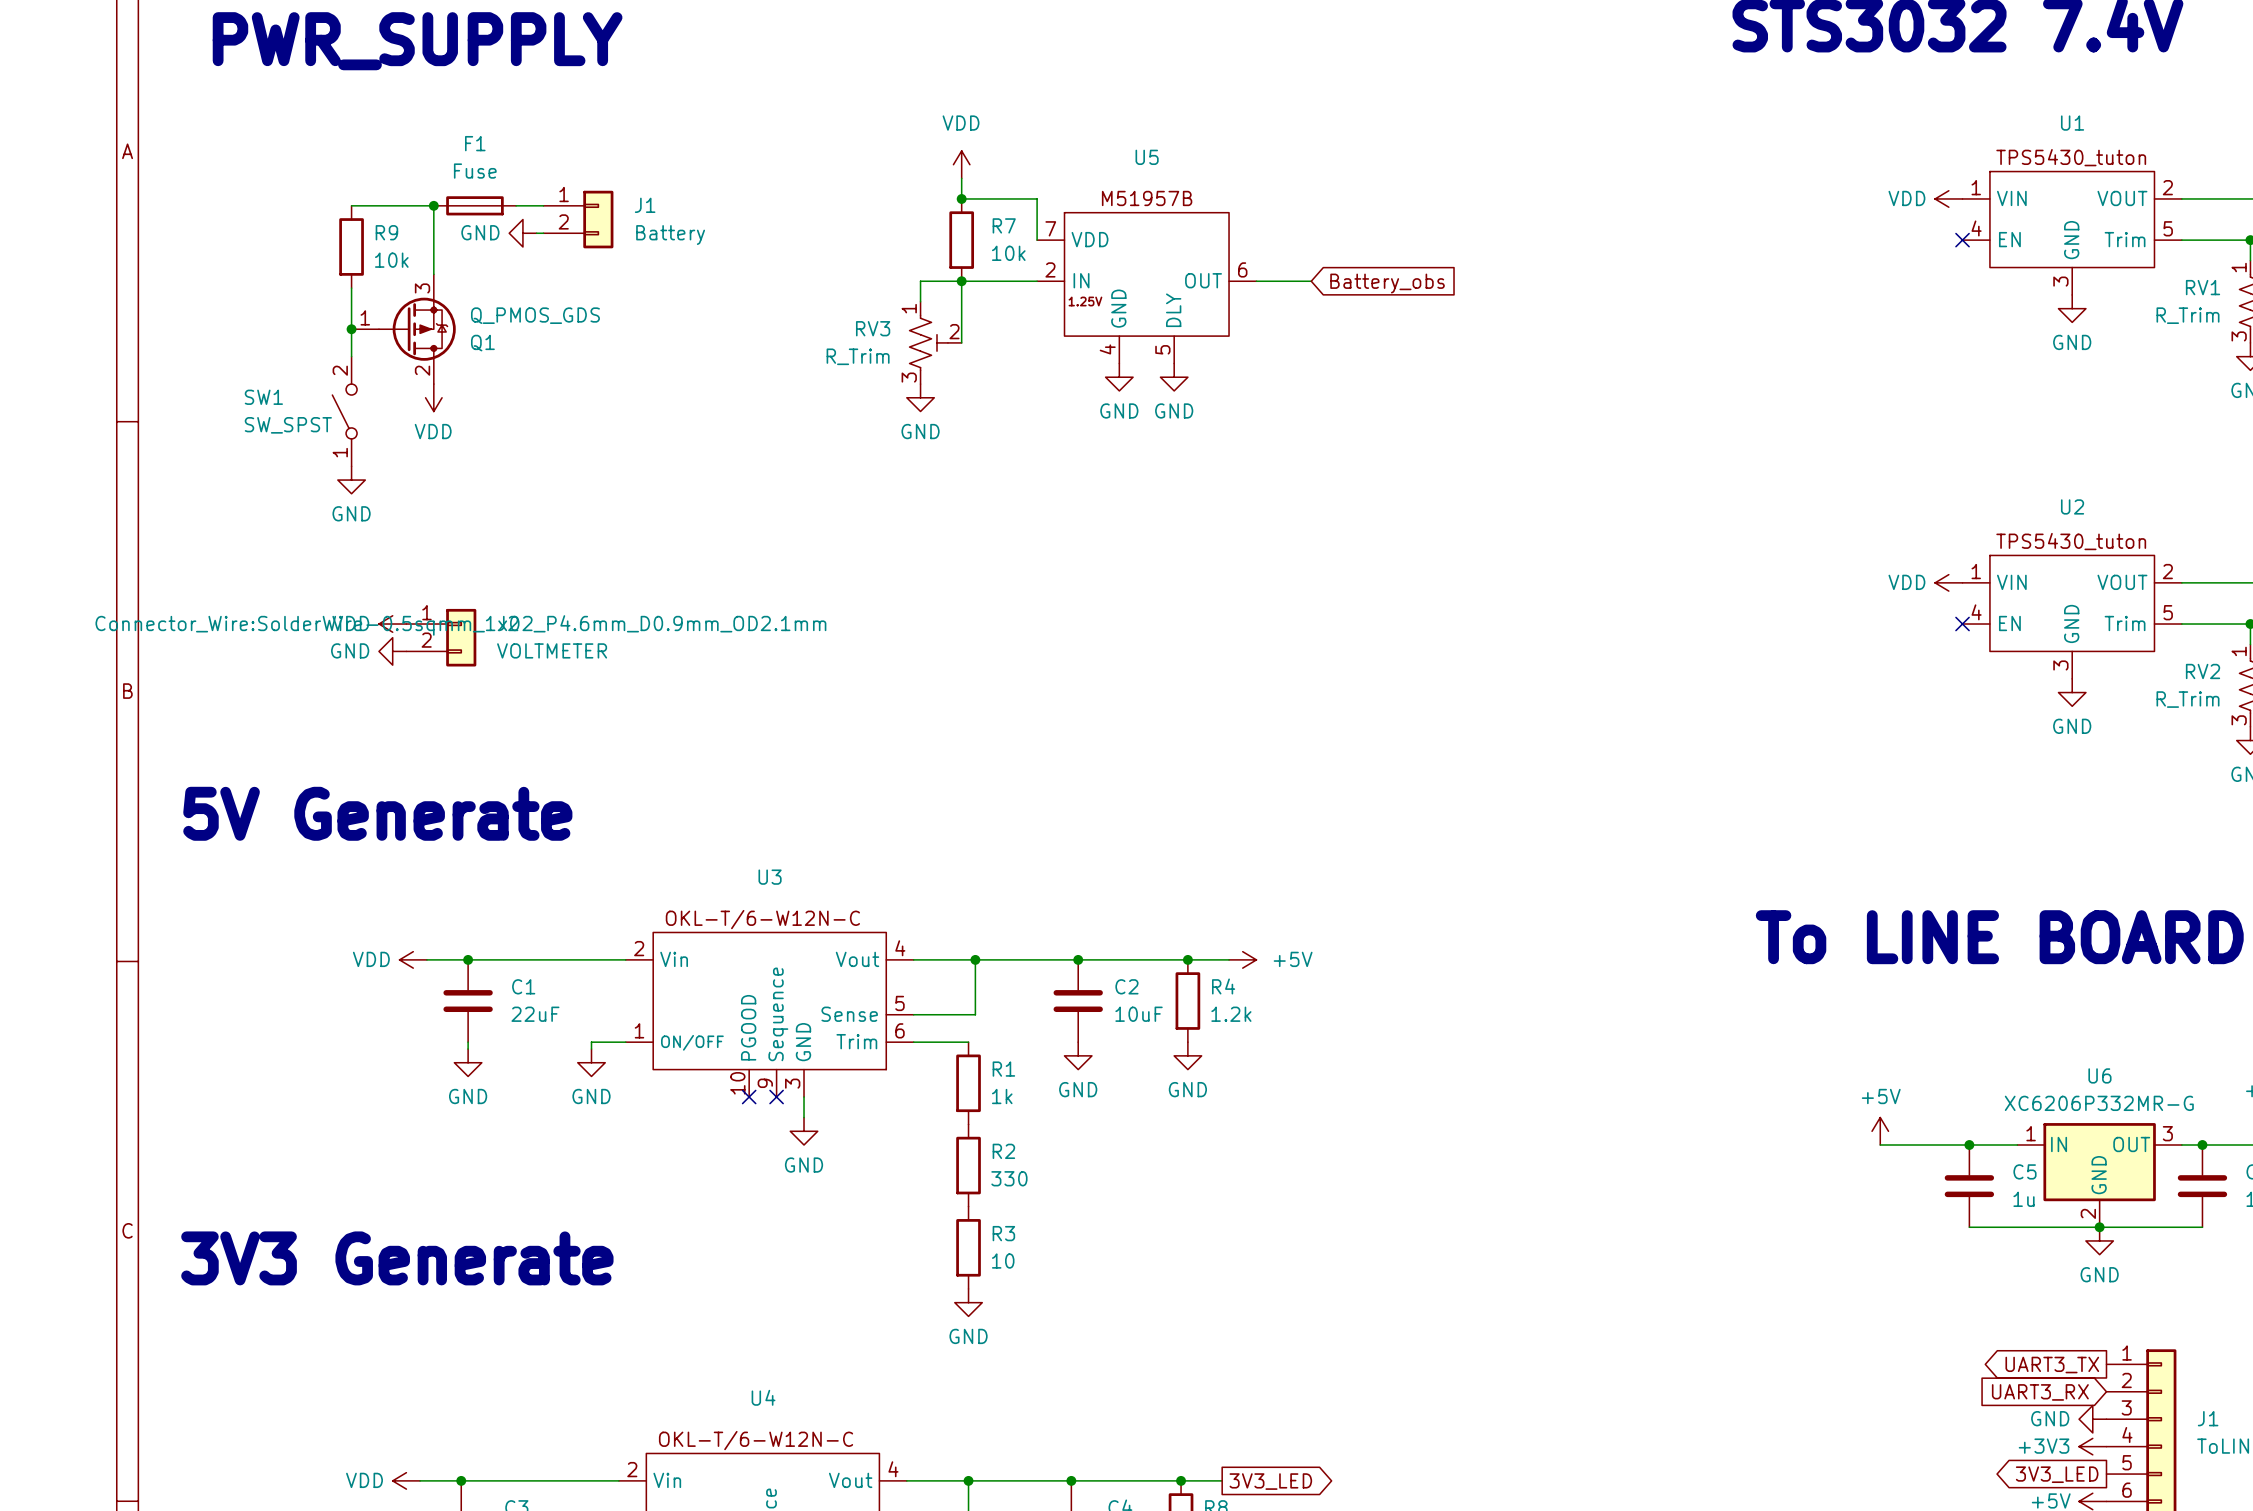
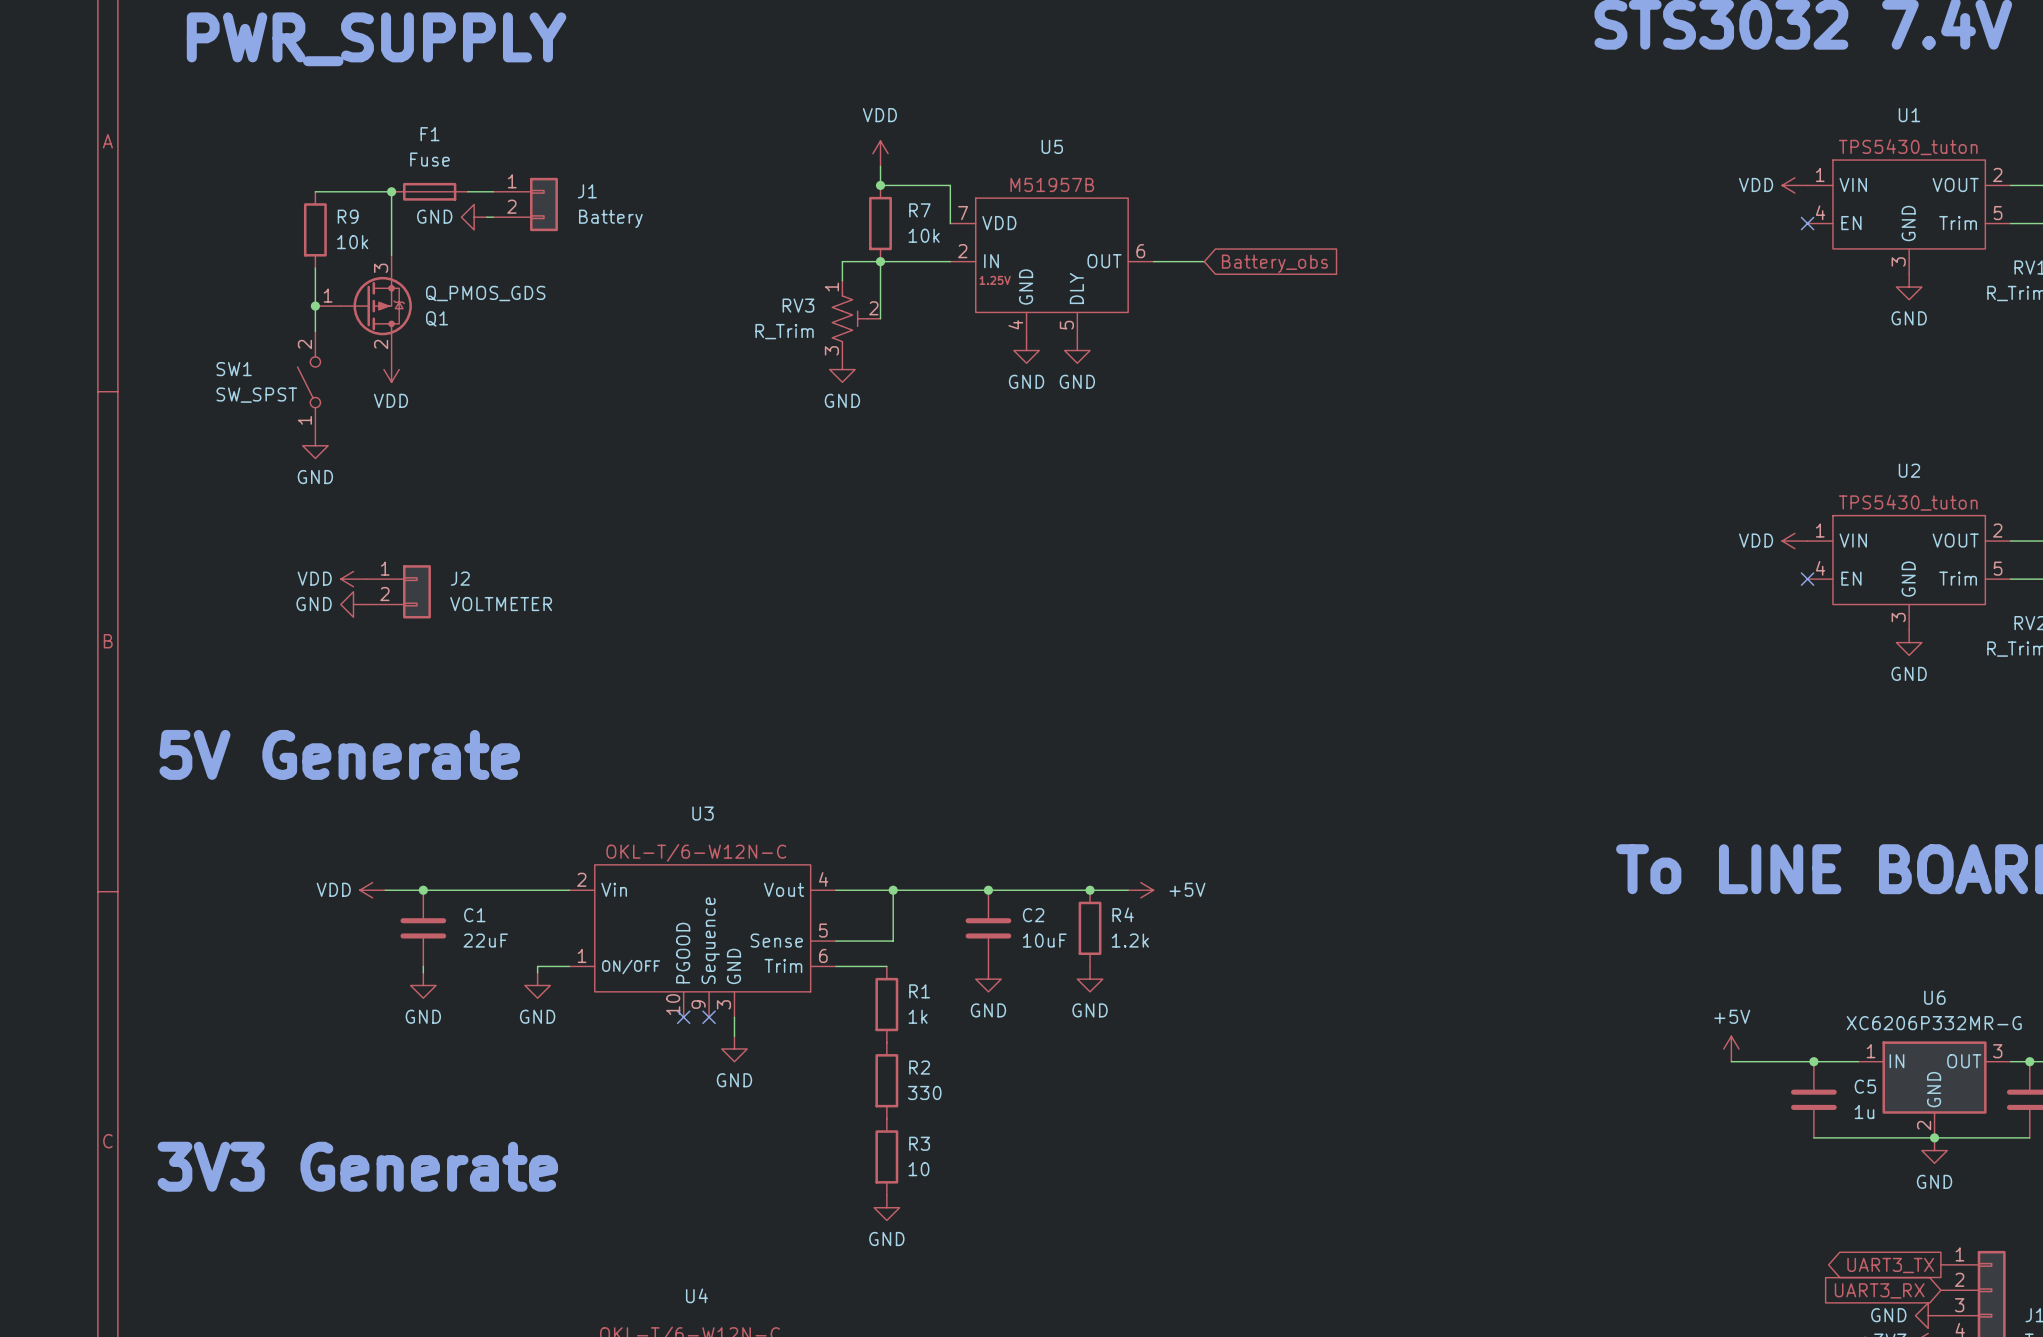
J2 text: Connector_Wire:SolderWire-0.5sqmm_1x02_P4.6mm_D0.9mm_OD2.1mm (460, 625) -> none

